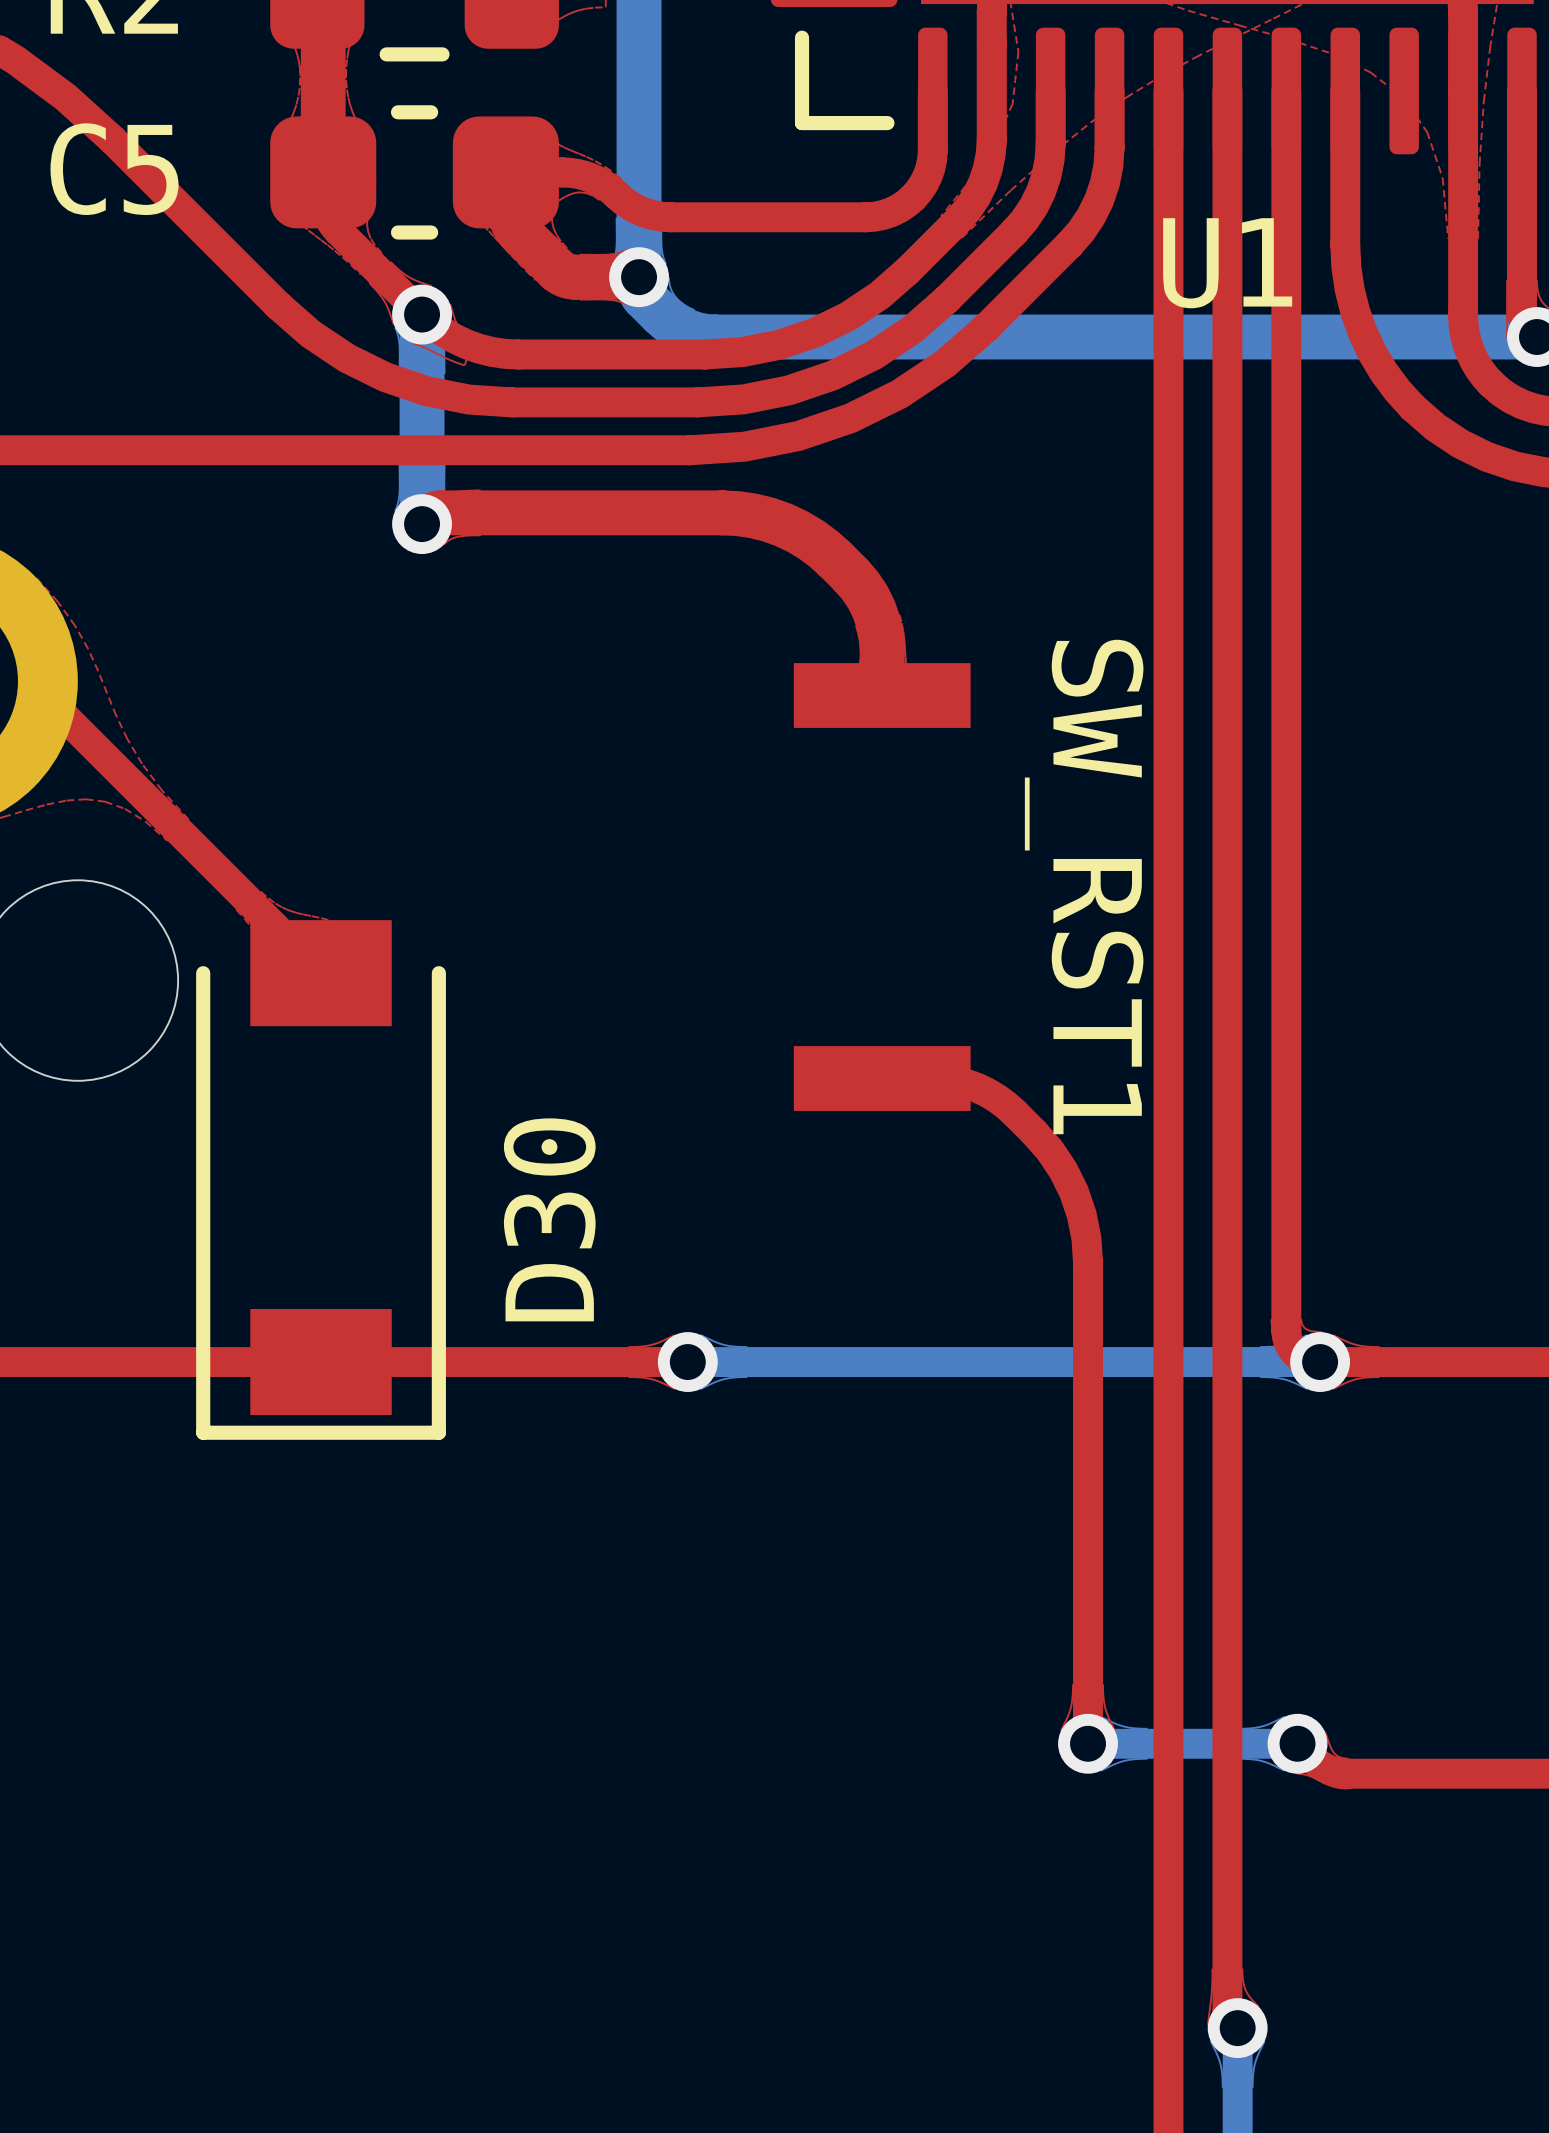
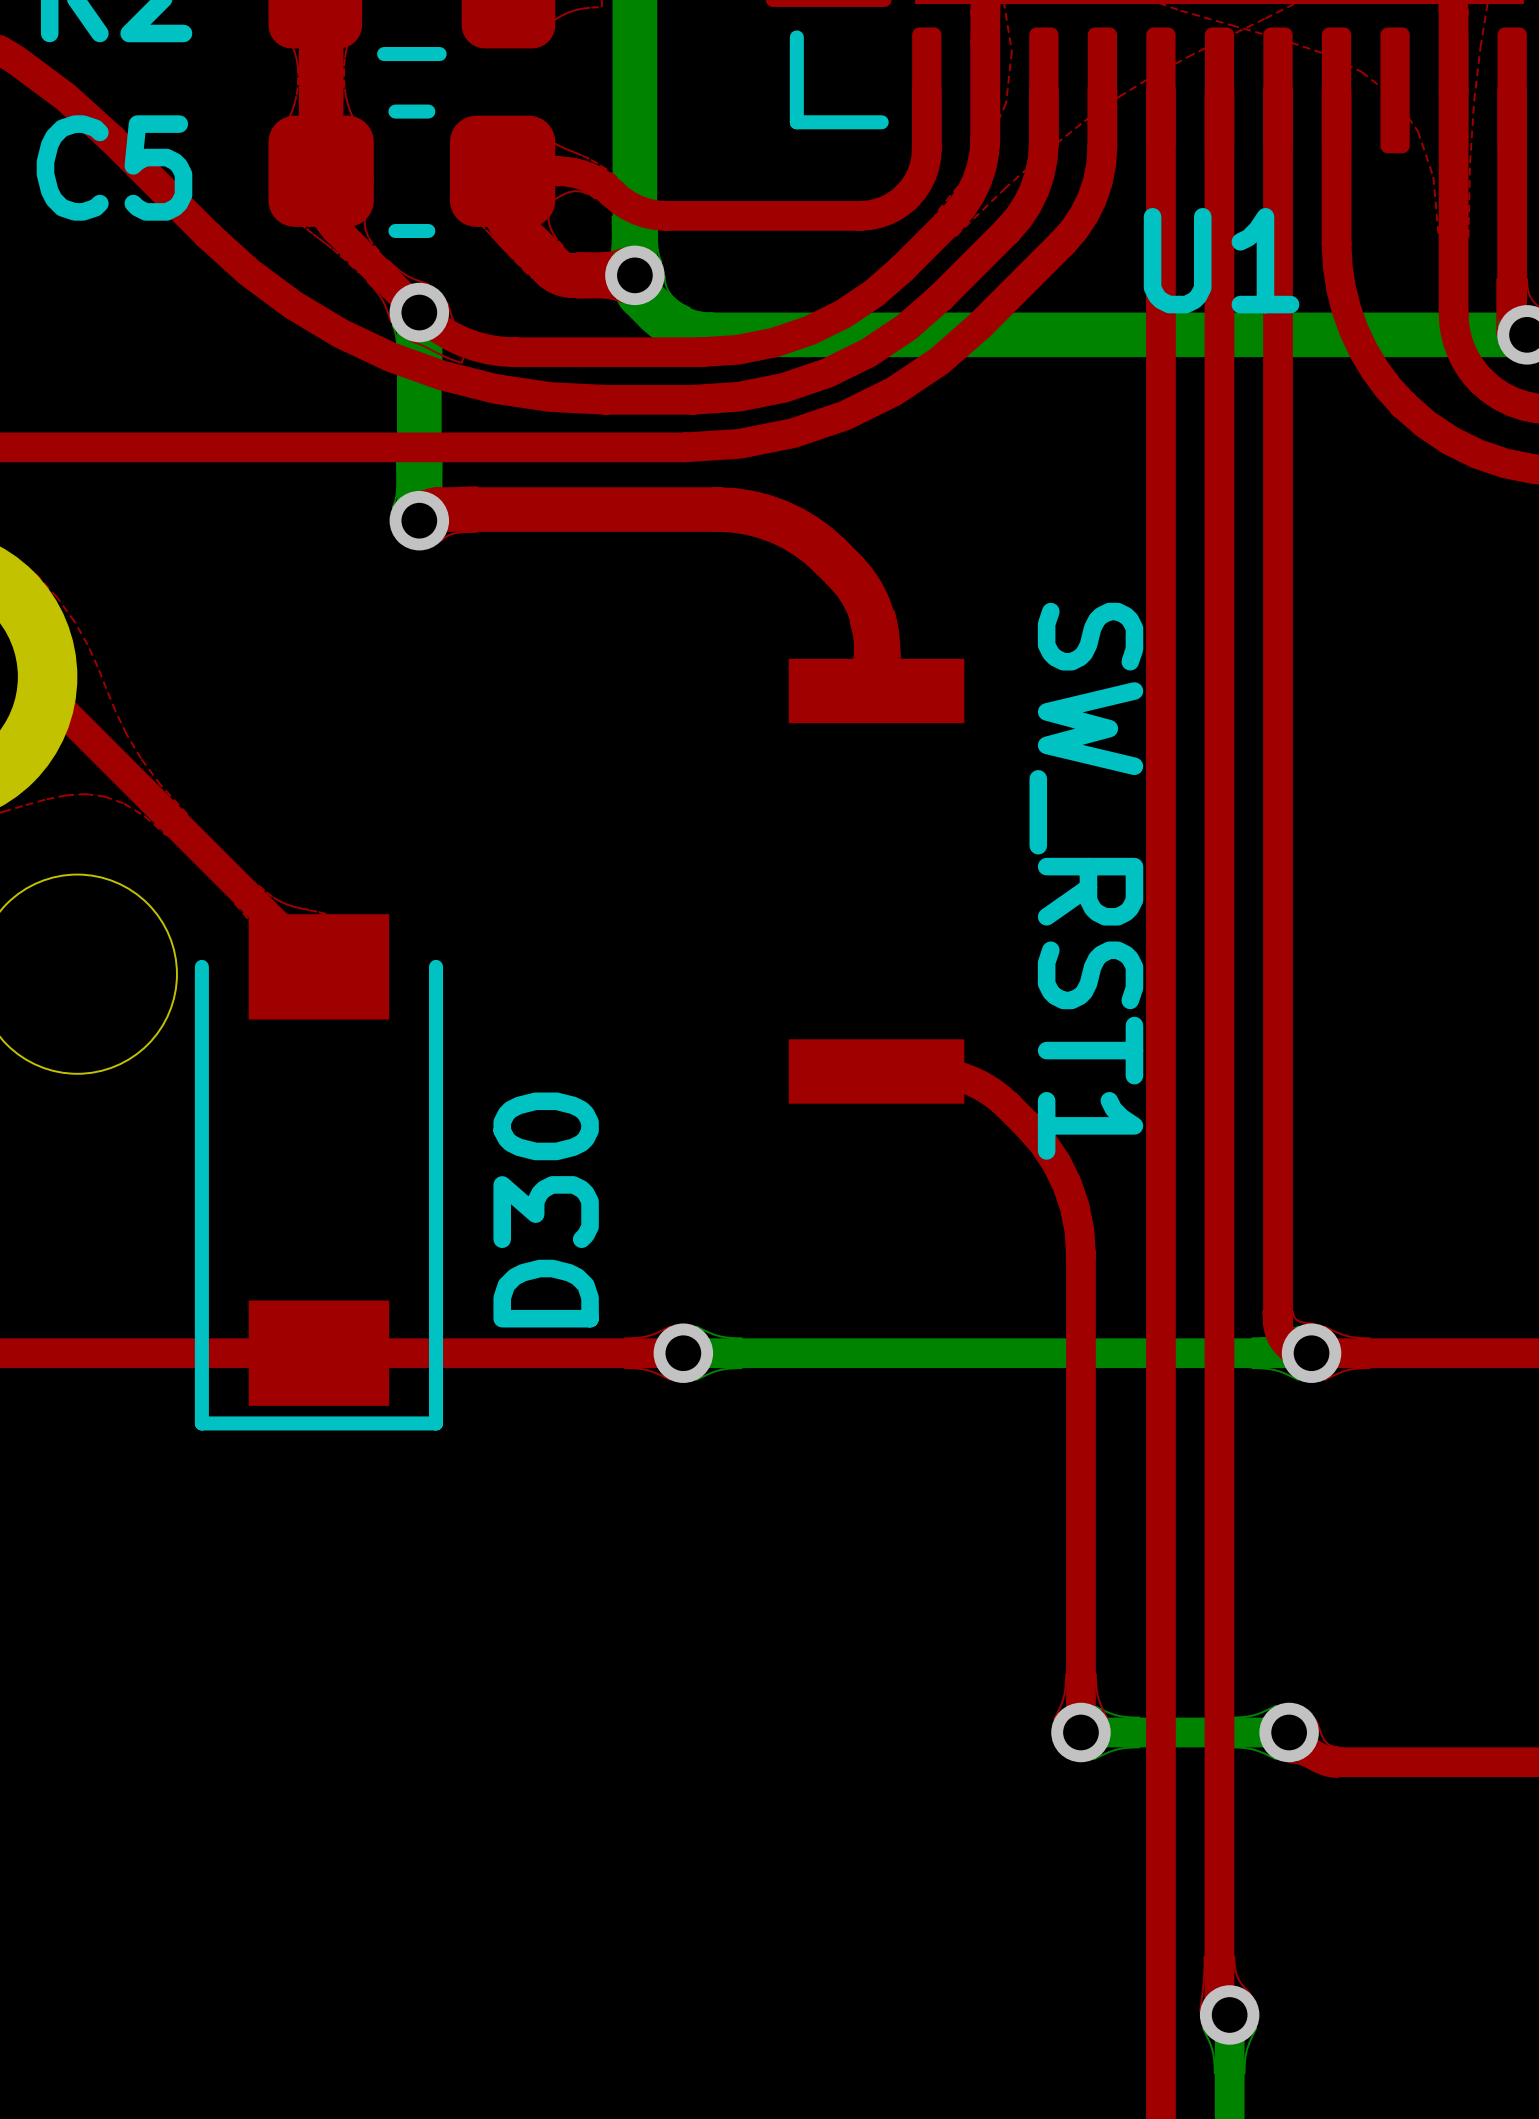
top track: (209, 236) (278, 305) (310, 334) (346, 358) (385, 377) (426, 391) (468, 399) (512, 402) (609, 402) -> (208, 235) (249, 272) (293, 305) (340, 333) (390, 357) (442, 375) (495, 388) (550, 397) (605, 399)

